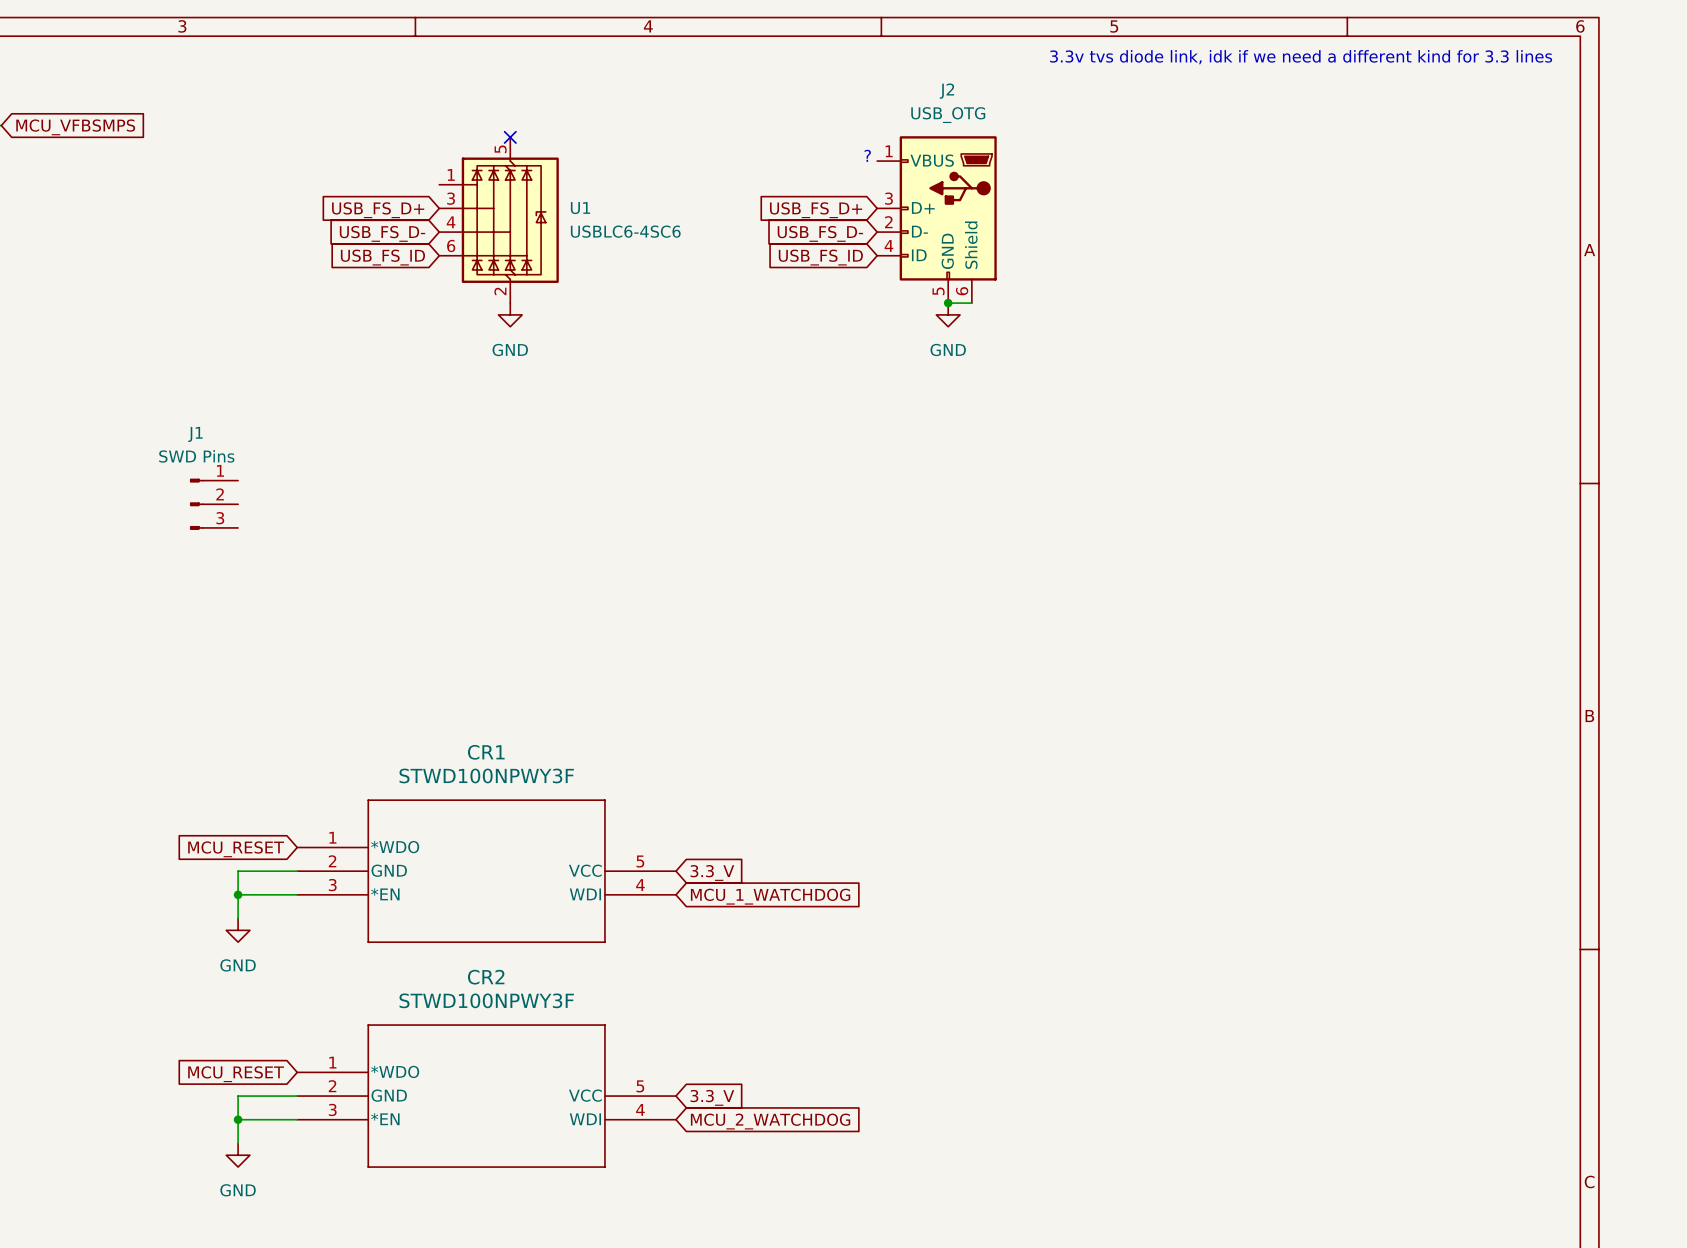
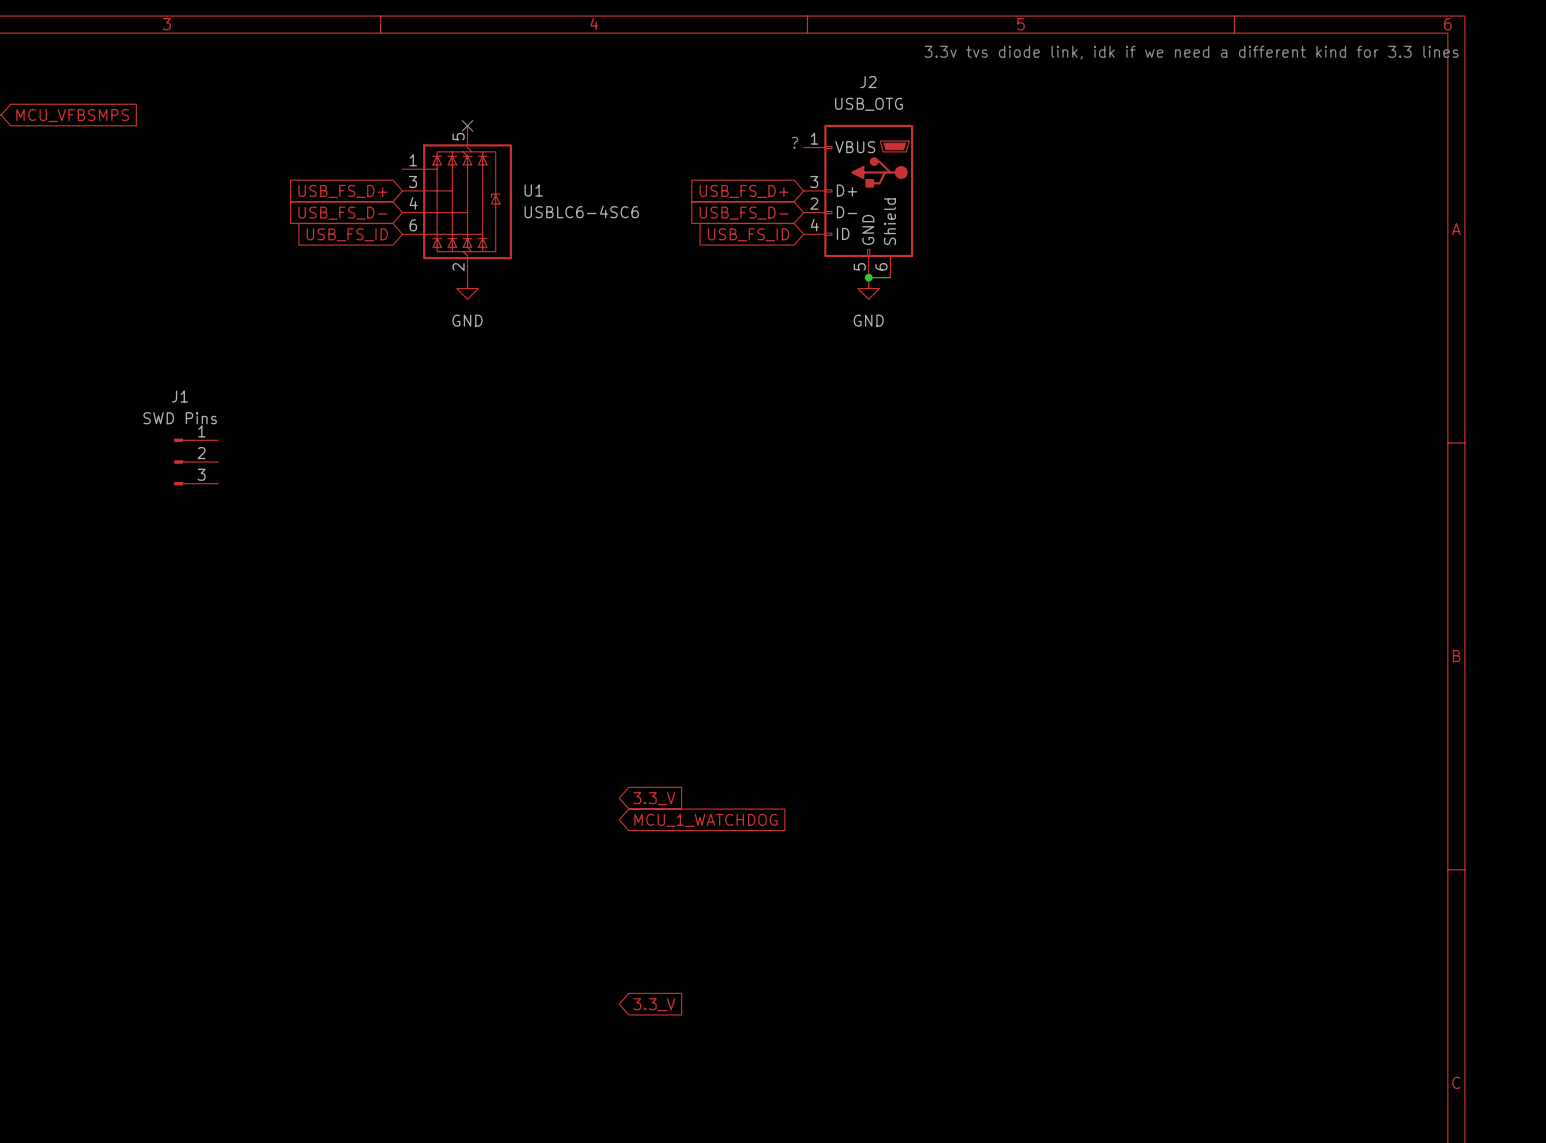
global label: MCU_RESET (236, 849) -> none
wire: (297, 871) (238, 871) (238, 918) -> none
CR1: STWD100NPWY3F (486, 871) -> none
wire: (238, 894) (297, 894) -> none
junction: (238, 894) -> none
power symbol: GND (238, 930) -> none
global label: MCU_RESET (236, 1074) -> none
wire: (297, 1096) (238, 1096) (238, 1143) -> none
CR2: STWD100NPWY3F (486, 1096) -> none
wire: (238, 1119) (297, 1119) -> none
junction: (238, 1119) -> none
global label: MCU_2_WATCHDOG (770, 1121) -> none
power symbol: GND (238, 1155) -> none

